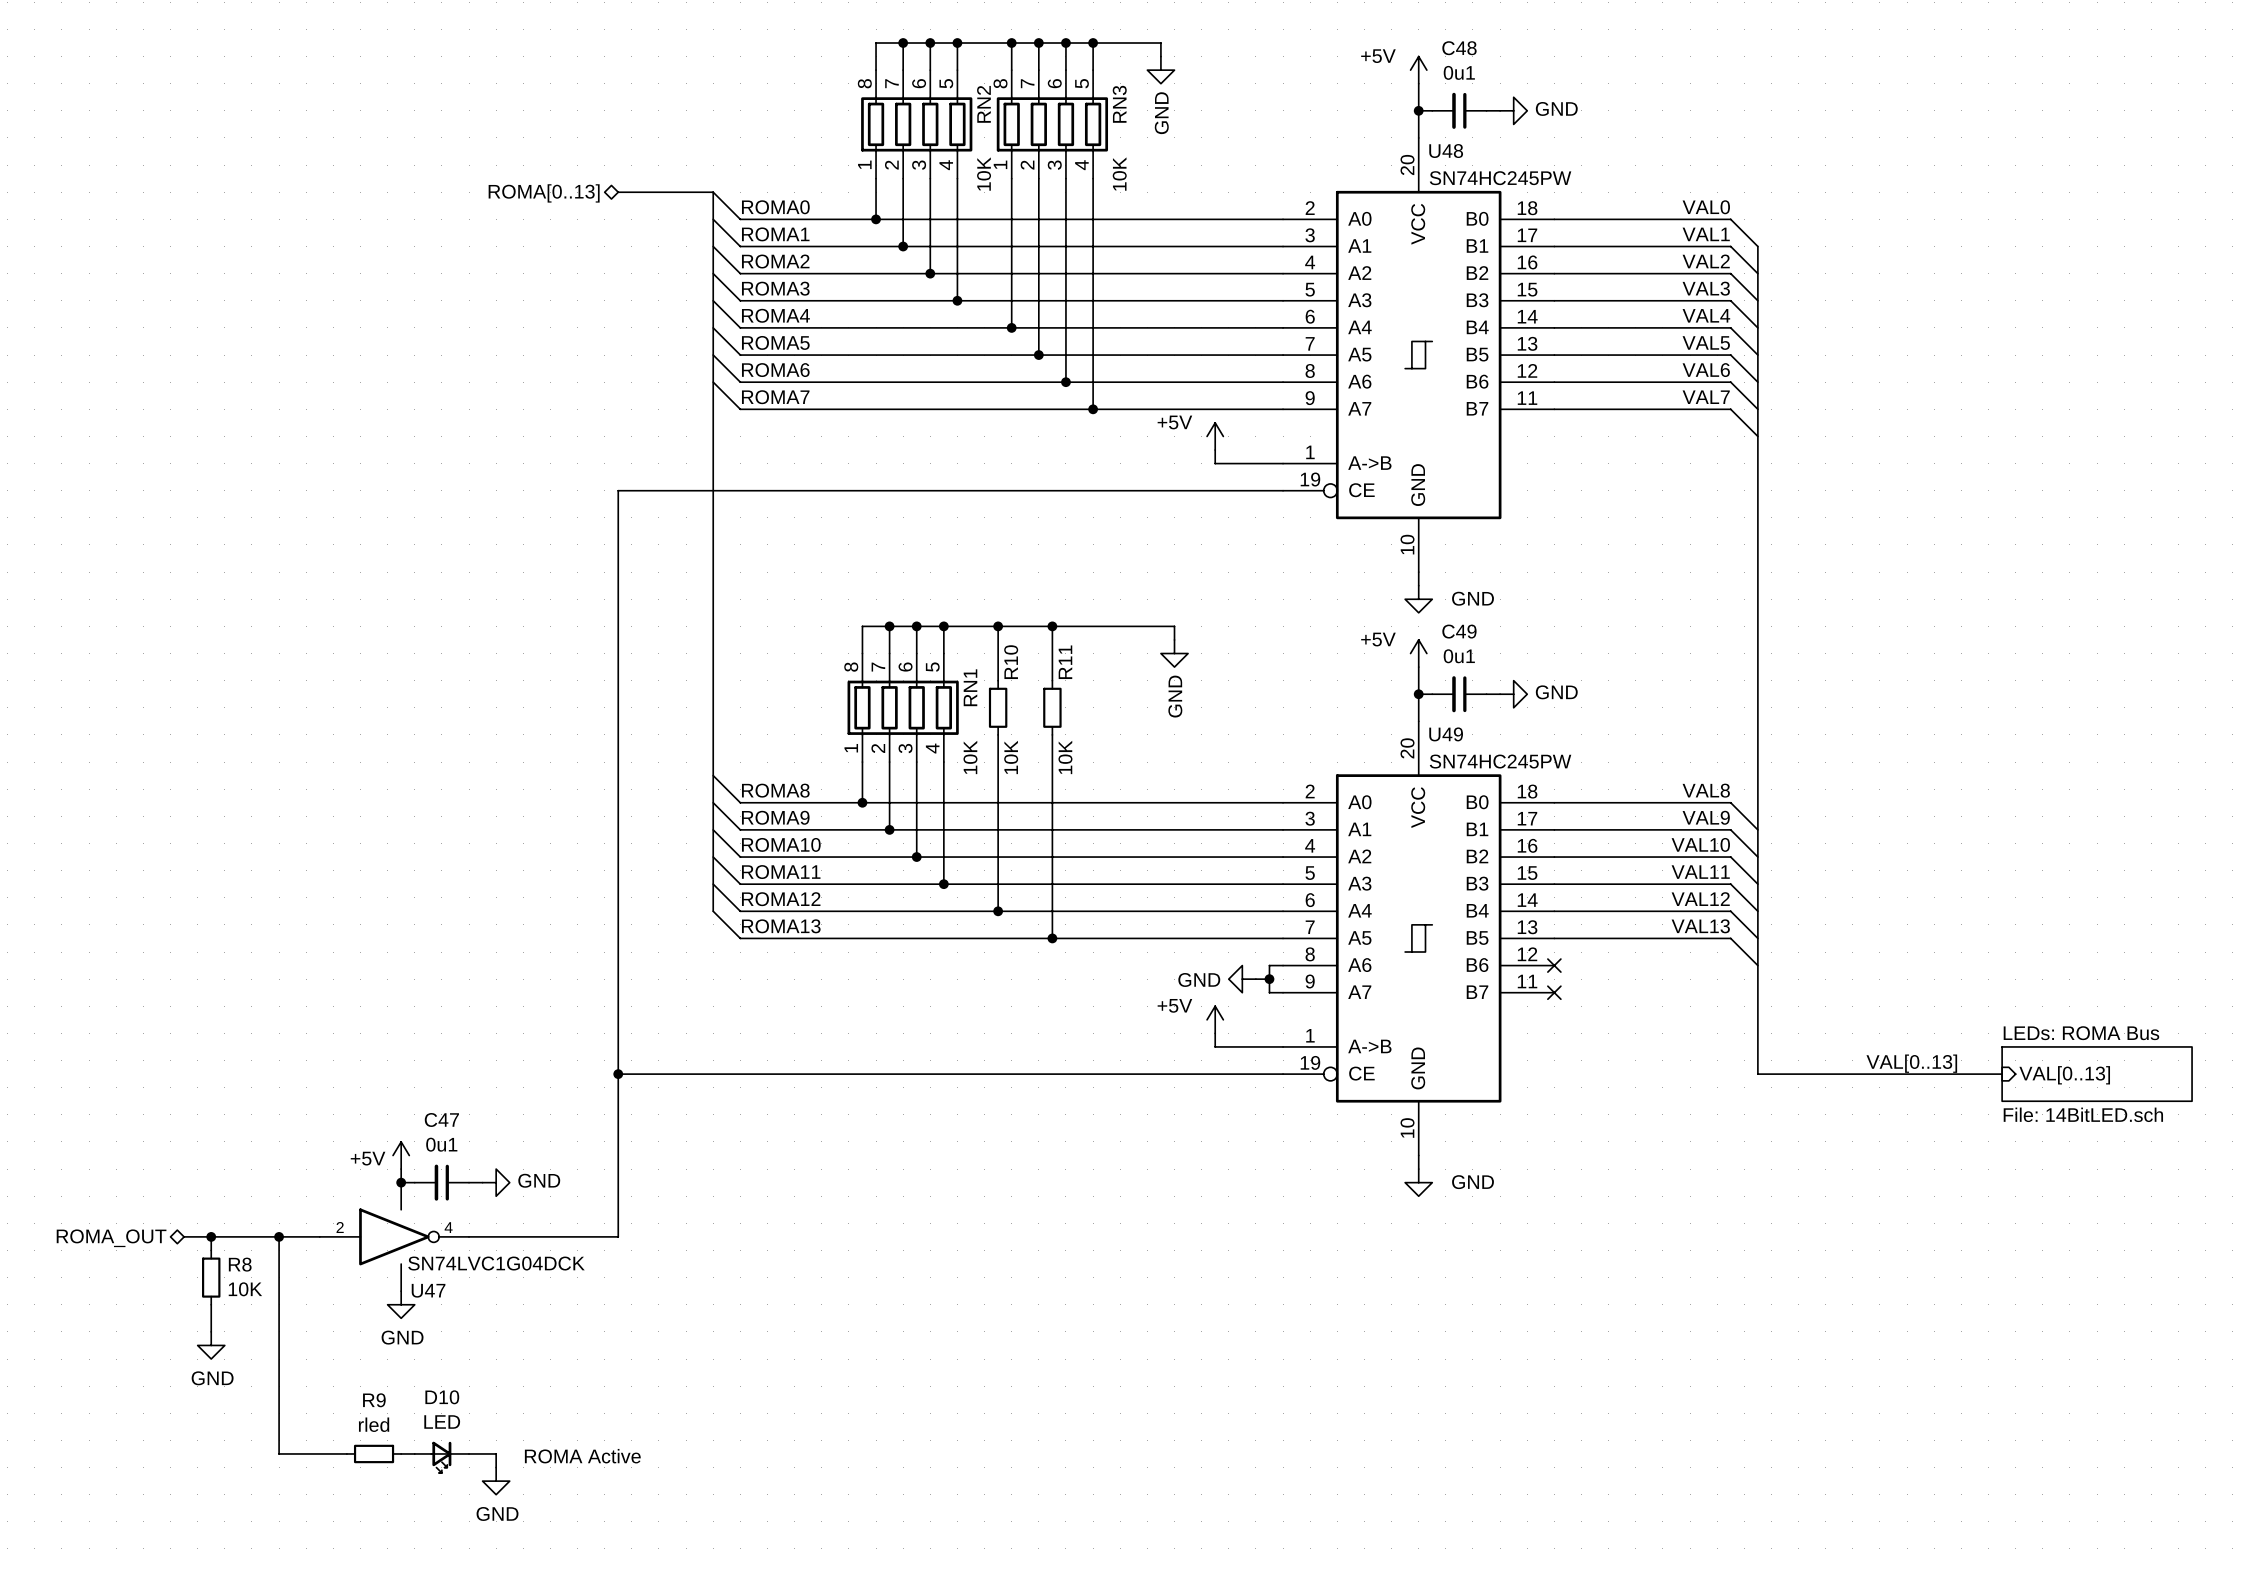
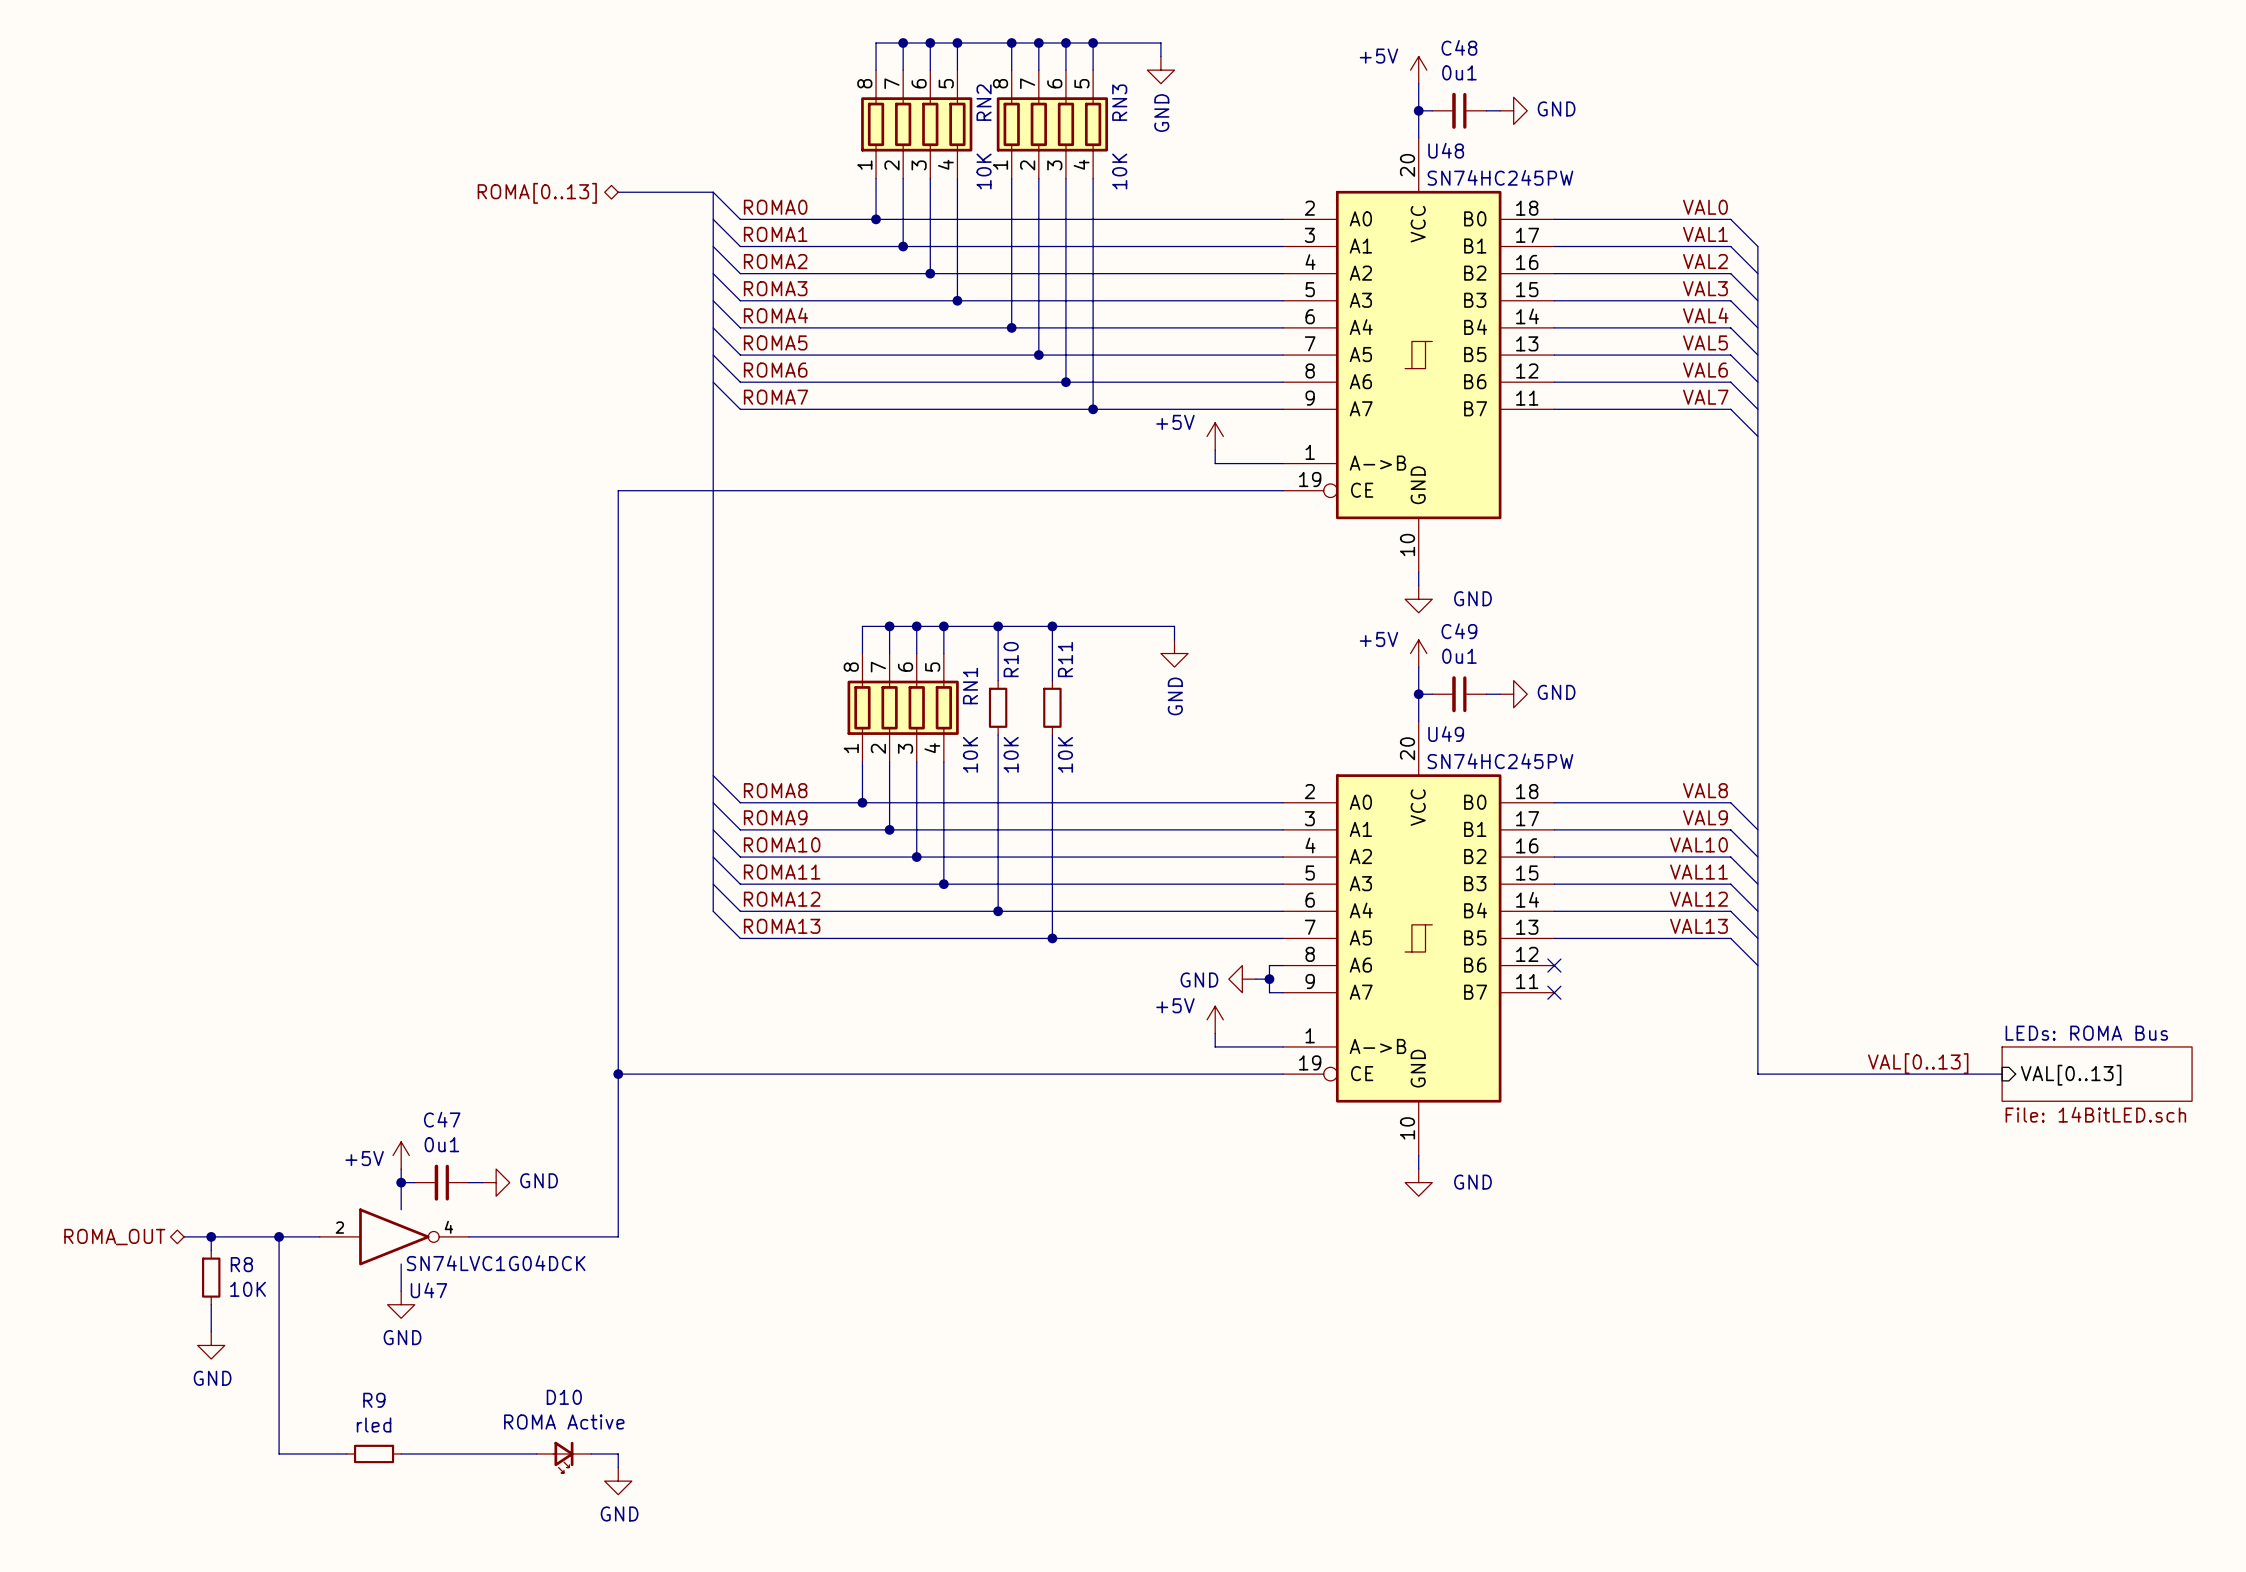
D10 value: LED (442, 1422) -> ROMA Active (564, 1422)
wire: (496, 1453) (496, 1467) -> (496, 1453) (536, 1453)
wire: none -> (591, 1453) (618, 1453) (618, 1467)
text: ROMA Active (582, 1456) -> none
D10 position: (441, 1457) -> (563, 1457)
power symbol position: GND (496, 1481) -> GND (618, 1481)

